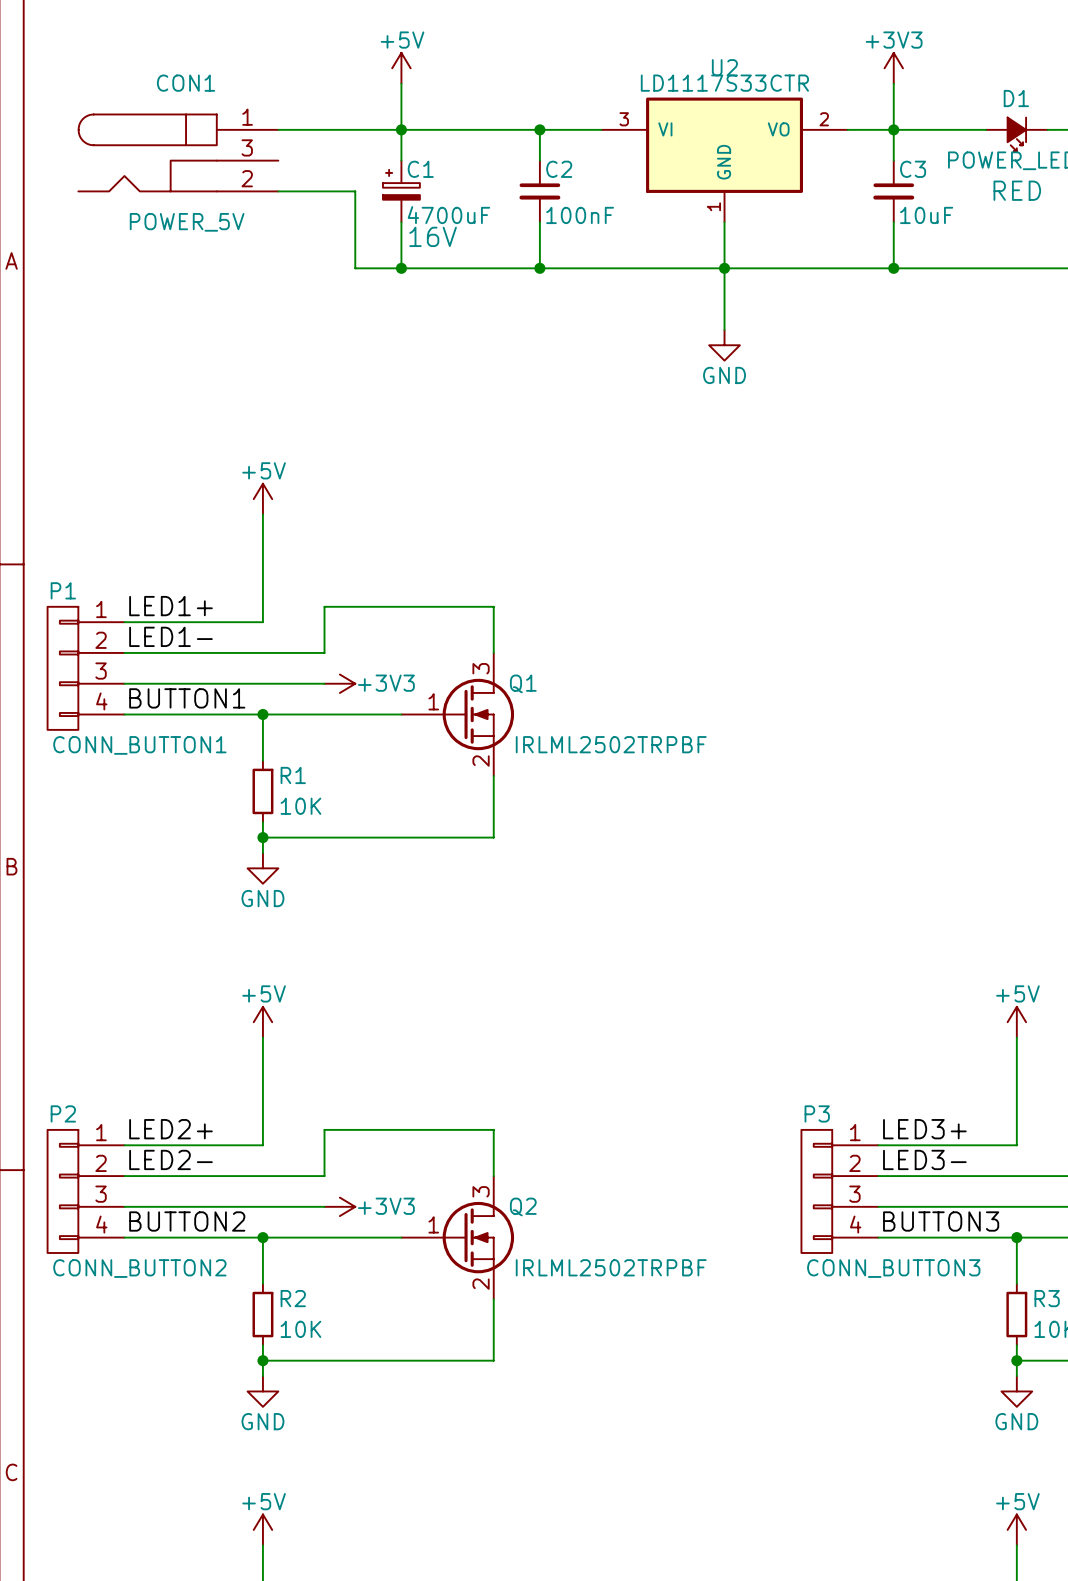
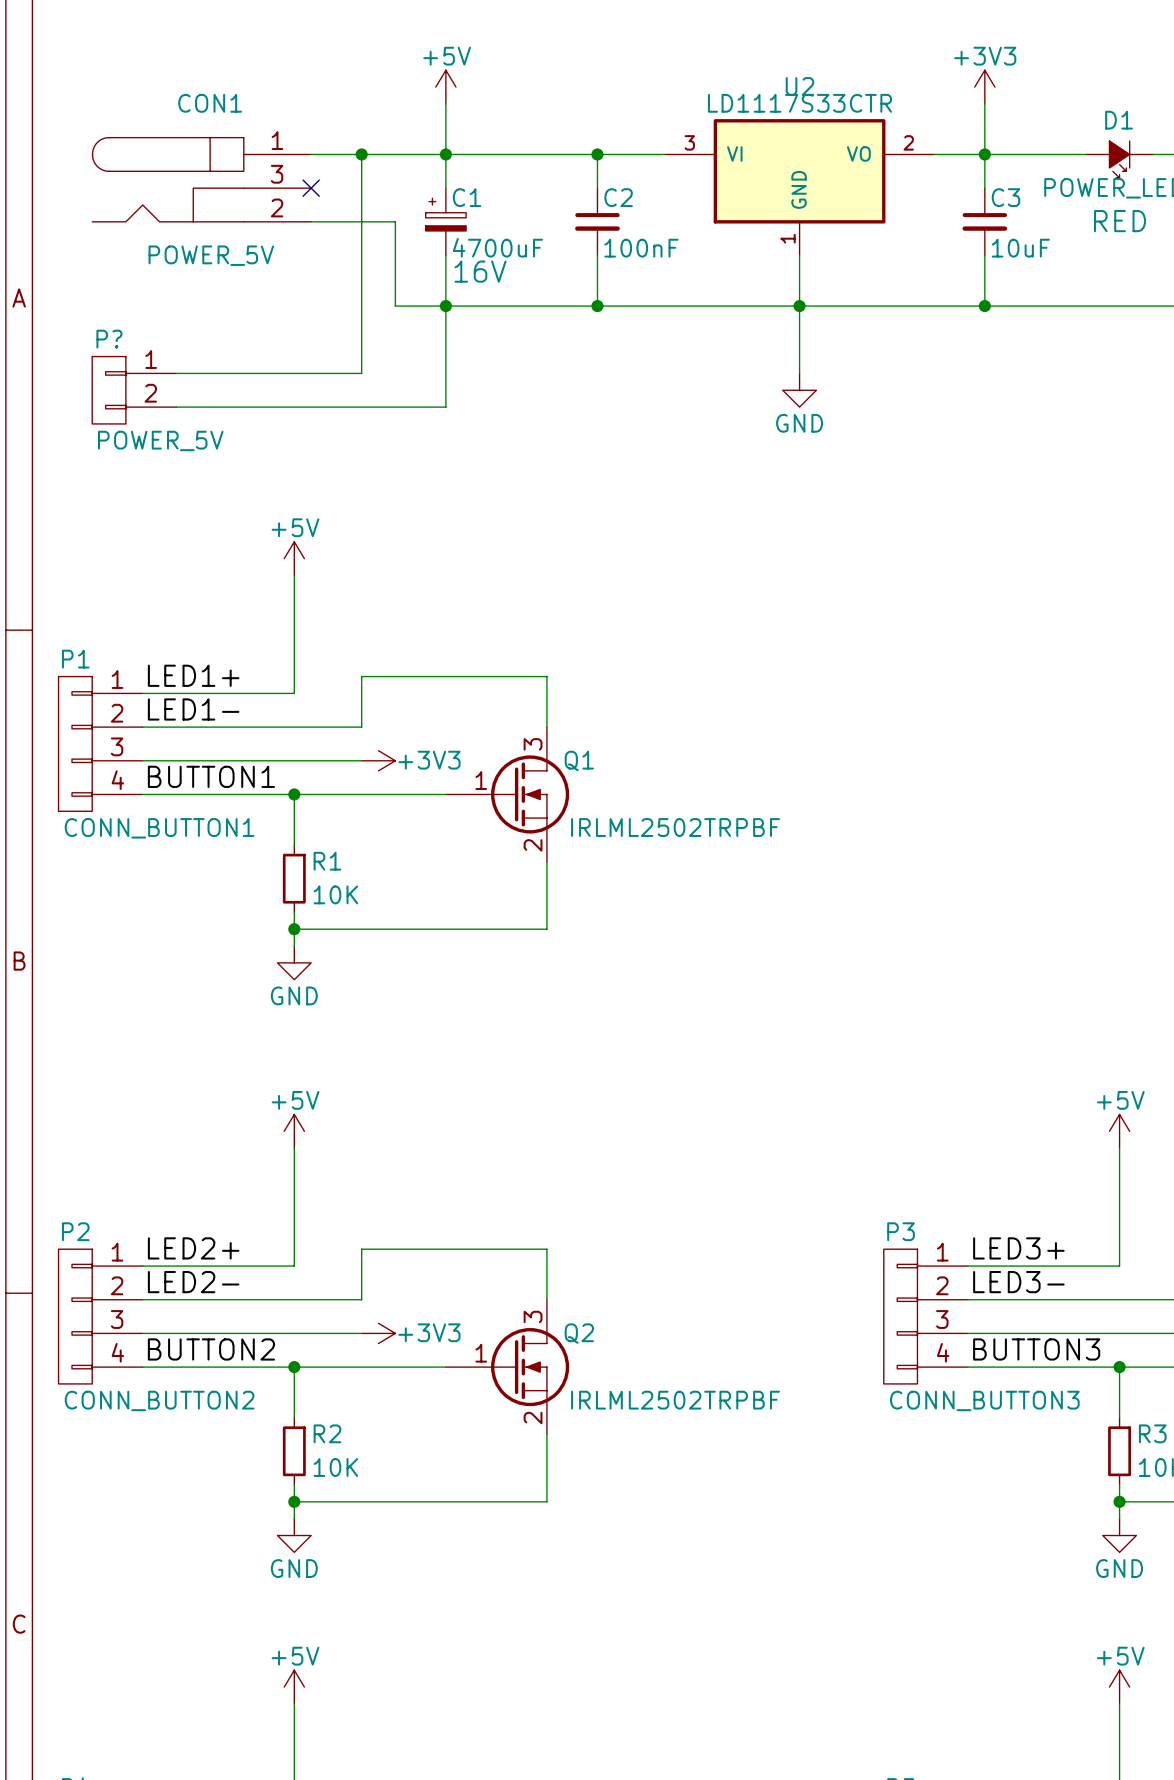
wire: none -> (361, 154) (361, 373) (176, 373)
junction: none -> (361, 154)
no-connect mark: none -> (311, 188)
wire: none -> (445, 306) (445, 407) (176, 407)
P?: none -> POWER_5V (134, 390)

